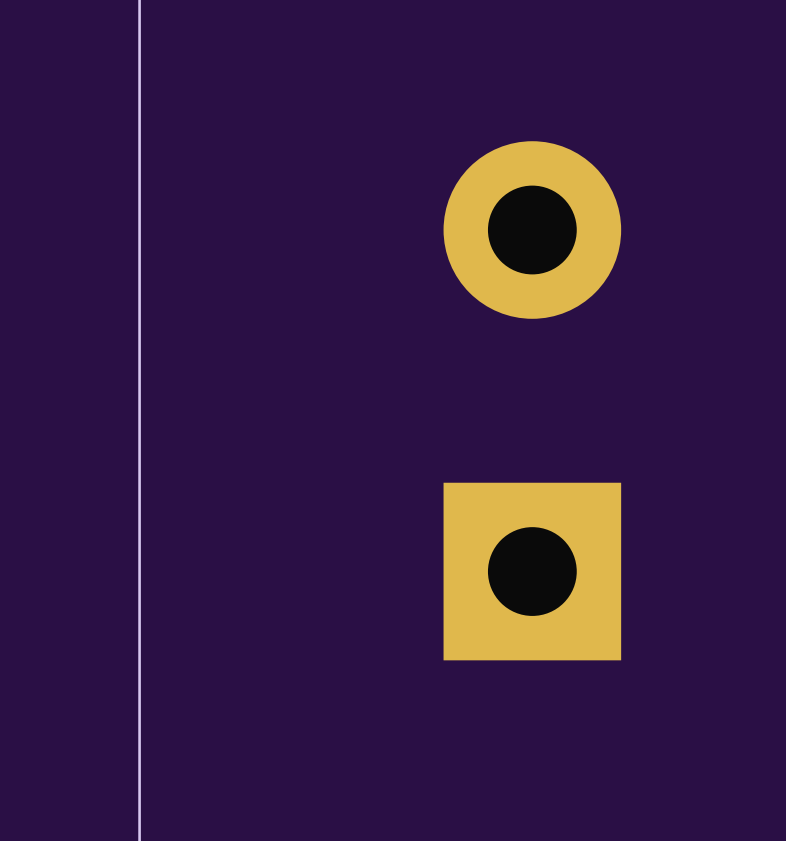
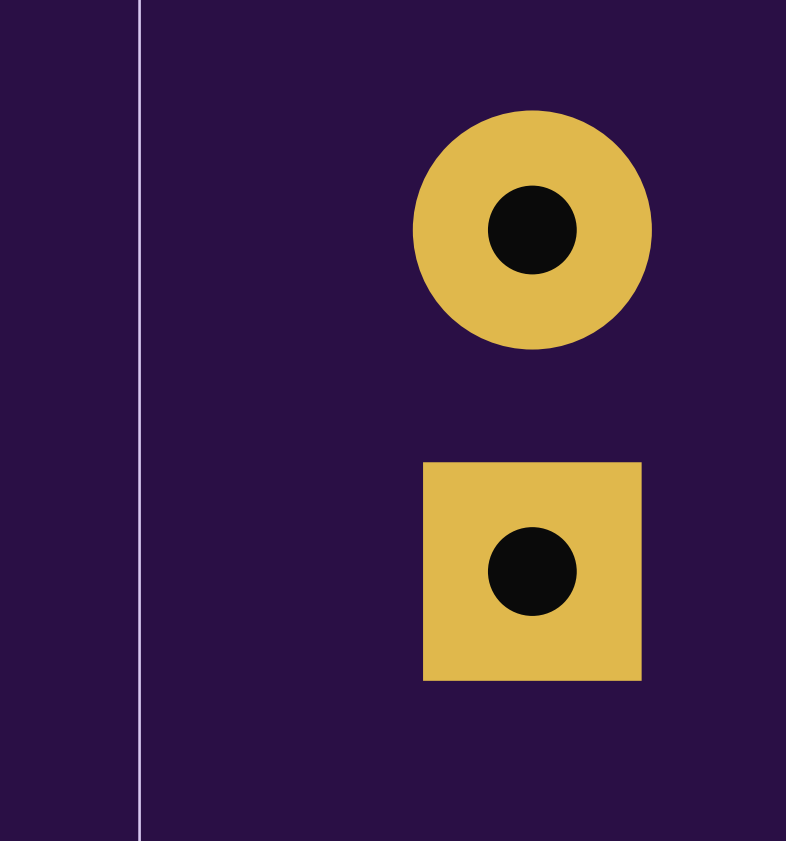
part footprint: [443, 141, 622, 661] -> [412, 110, 652, 681]

